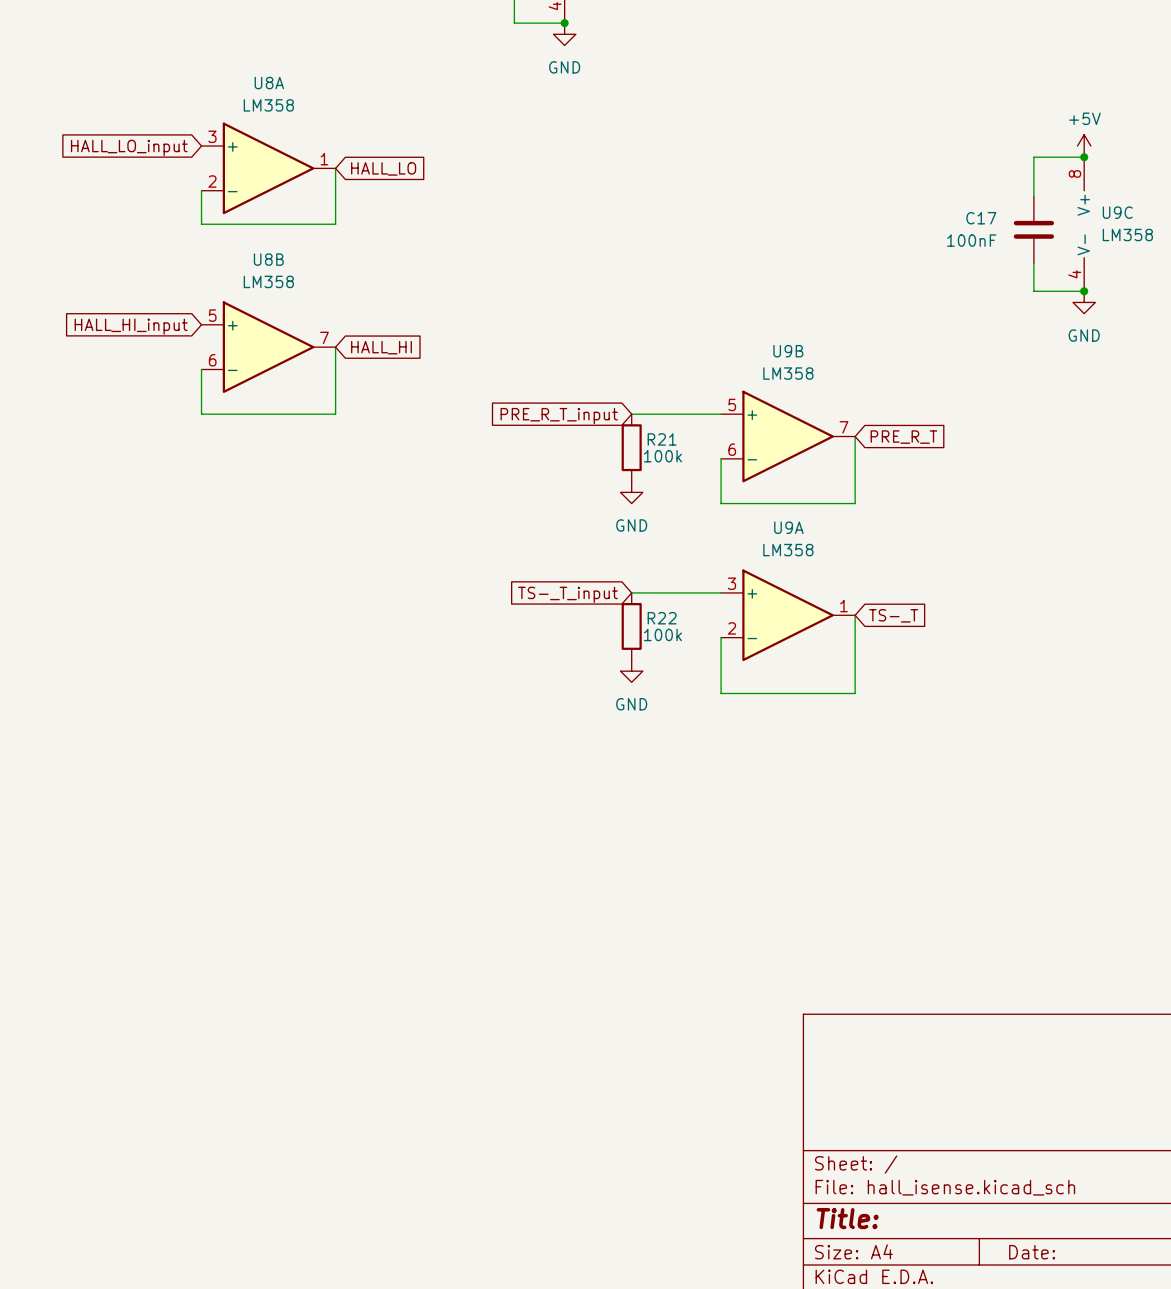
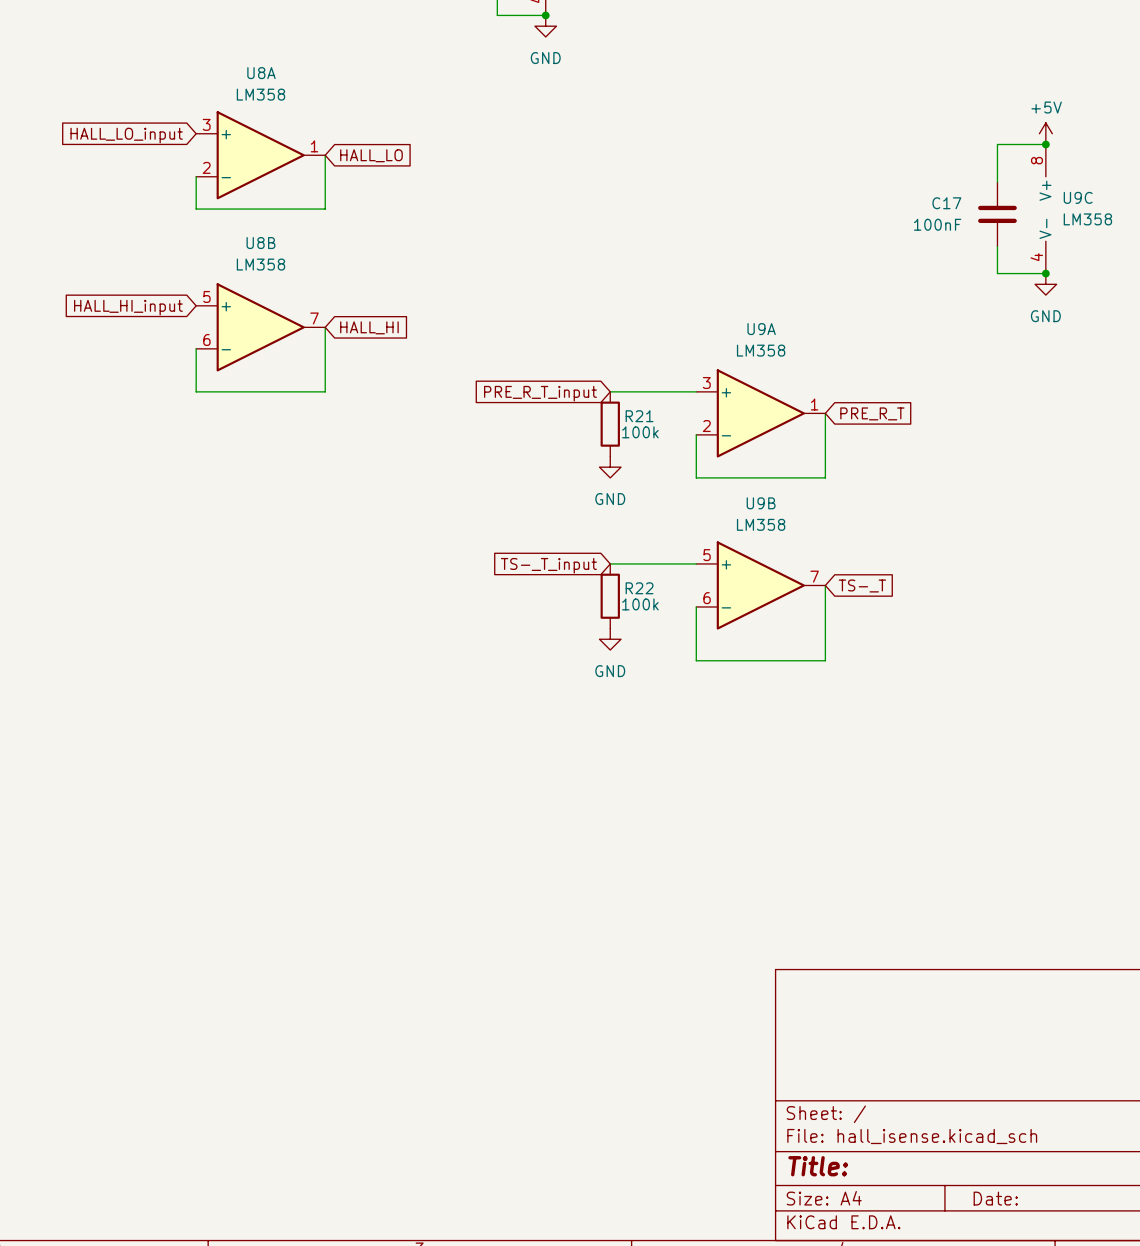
U9B position: (788, 436) -> (760, 585)
U9A position: (788, 615) -> (760, 413)

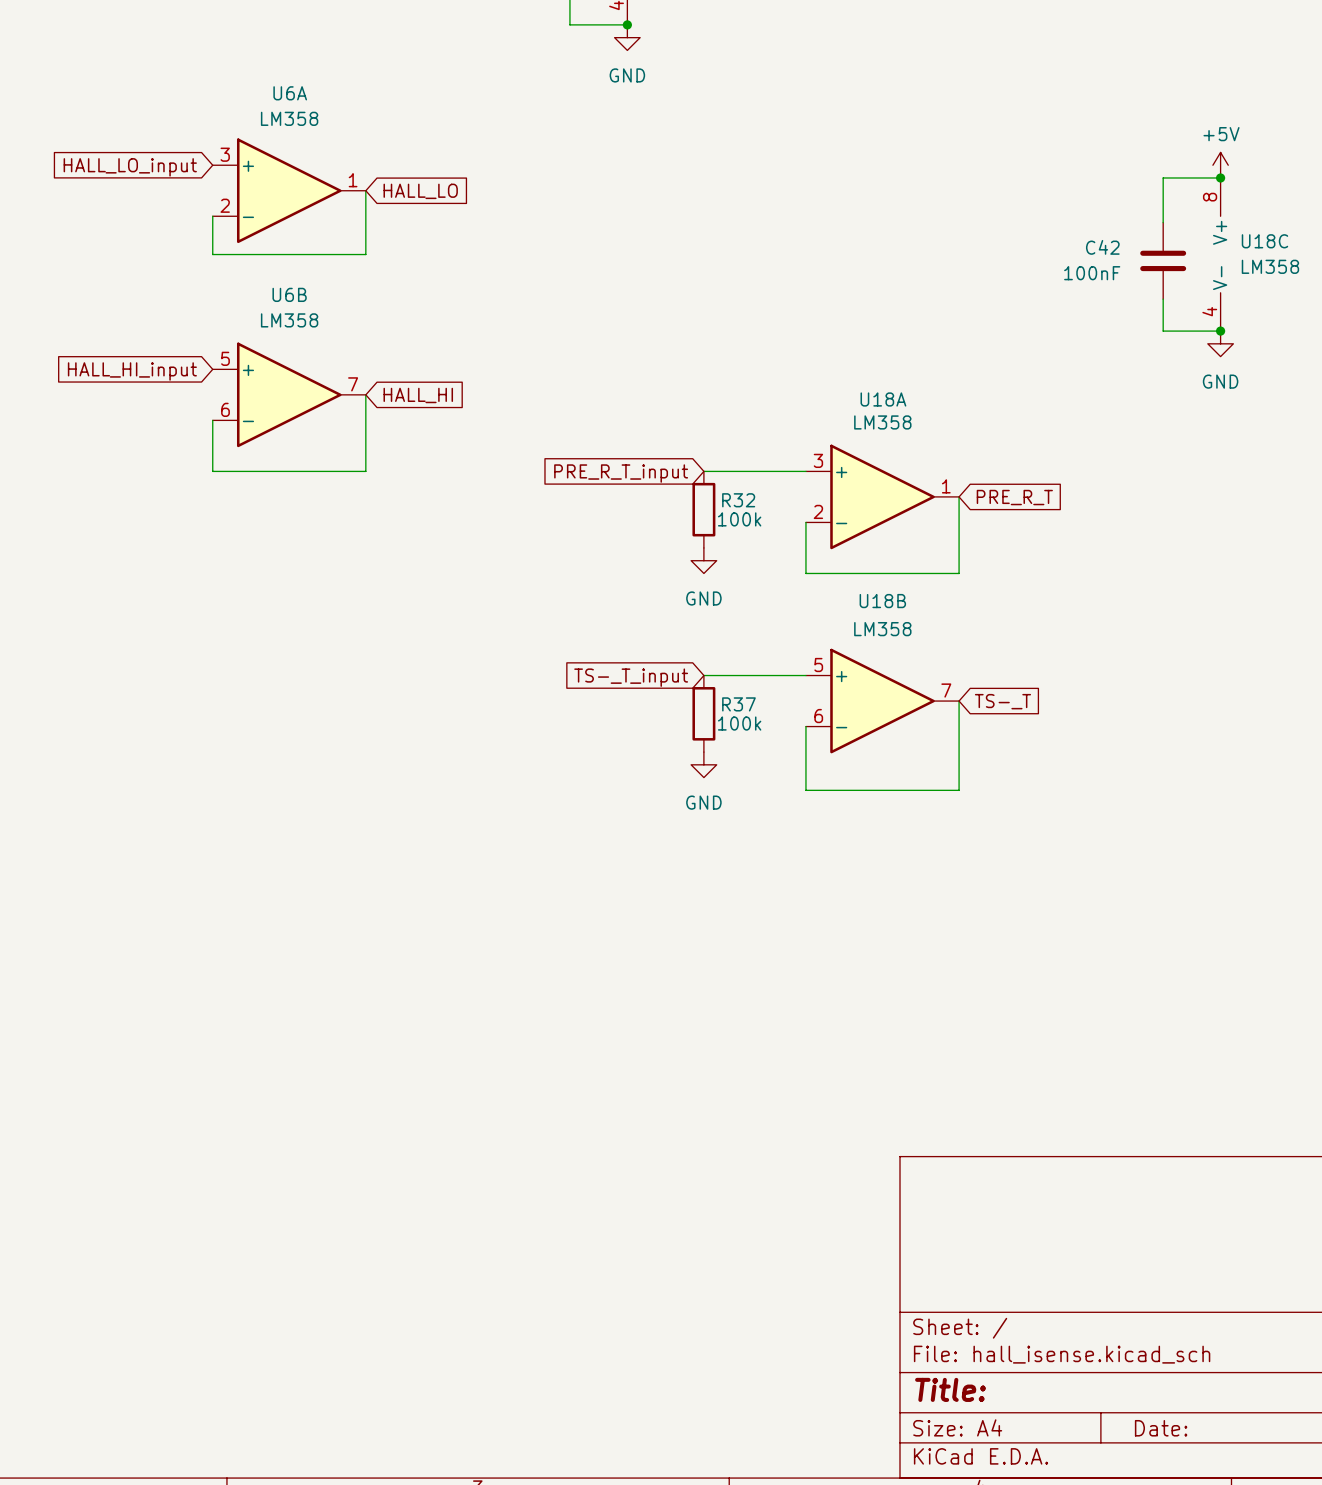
U8A name: U8A (261, 73) -> U6A (290, 93)
U9C name: U9C (1078, 197) -> U18C (1264, 241)
C17 name: C17 (946, 203) -> C42 (1102, 247)
U8B name: U8B (260, 243) -> U6B (289, 294)
U9A name: U9A (761, 329) -> U18A (883, 399)
R21 name: R21 (639, 416) -> R32 (738, 500)
U9B name: U9B (761, 503) -> U18B (882, 601)
R22 name: R22 (639, 588) -> R37 (738, 704)

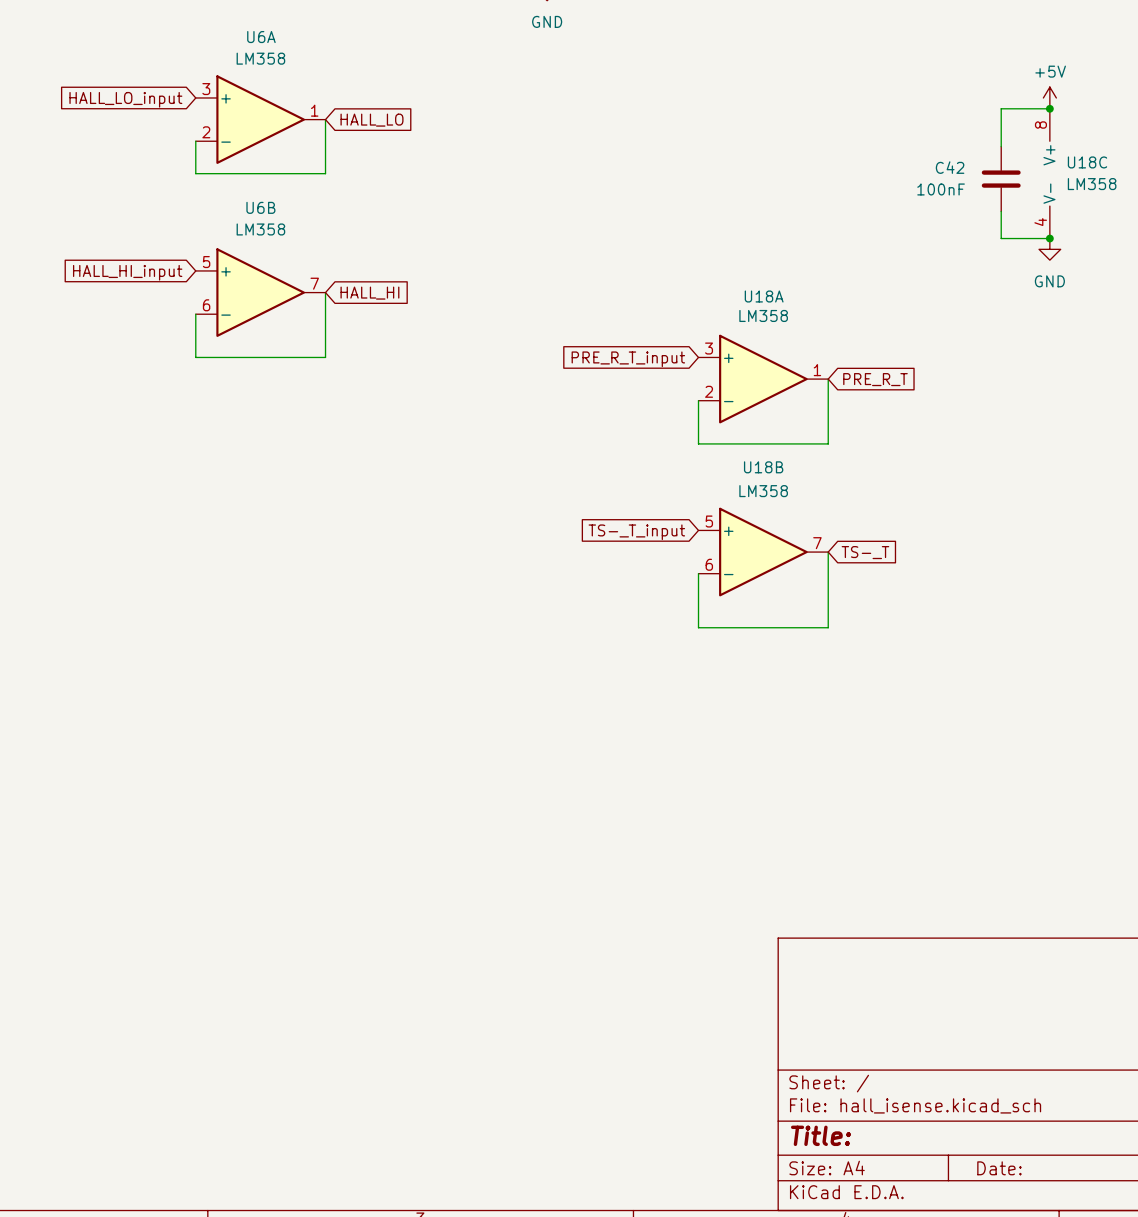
wire: (703, 471) (805, 471) -> none
global label position: PRE_R_T_input (621, 473) -> PRE_R_T_input (628, 359)
R32: 100k (703, 509) -> none
power symbol: GND (703, 560) -> none
wire: (703, 675) (805, 675) -> none
global label position: TS-_T_input (631, 677) -> TS-_T_input (636, 532)
R37: 100k (703, 713) -> none
power symbol: GND (703, 764) -> none

